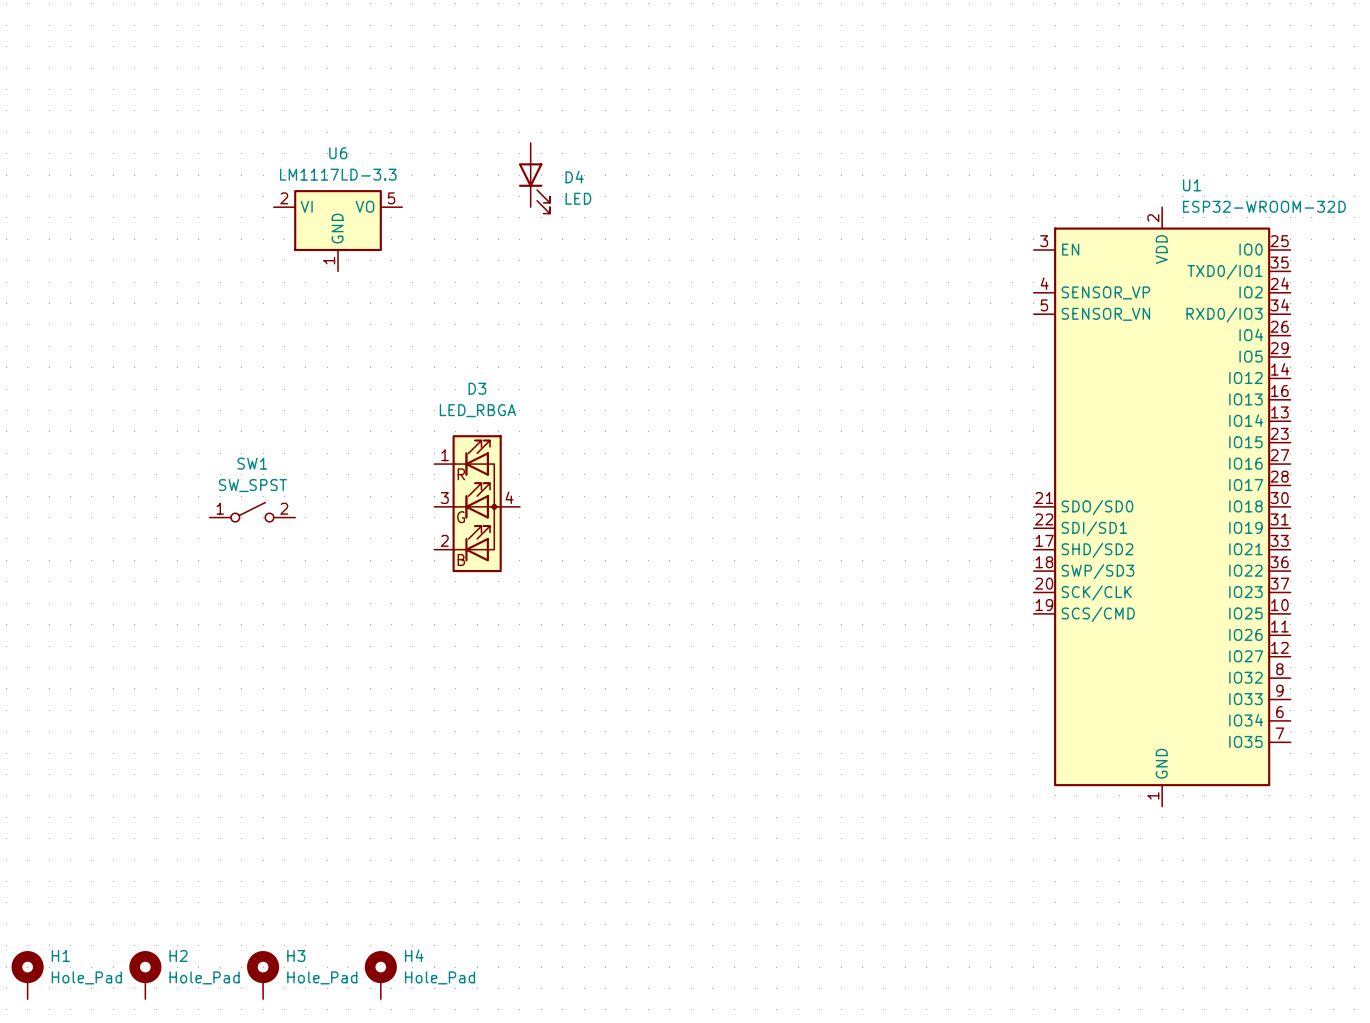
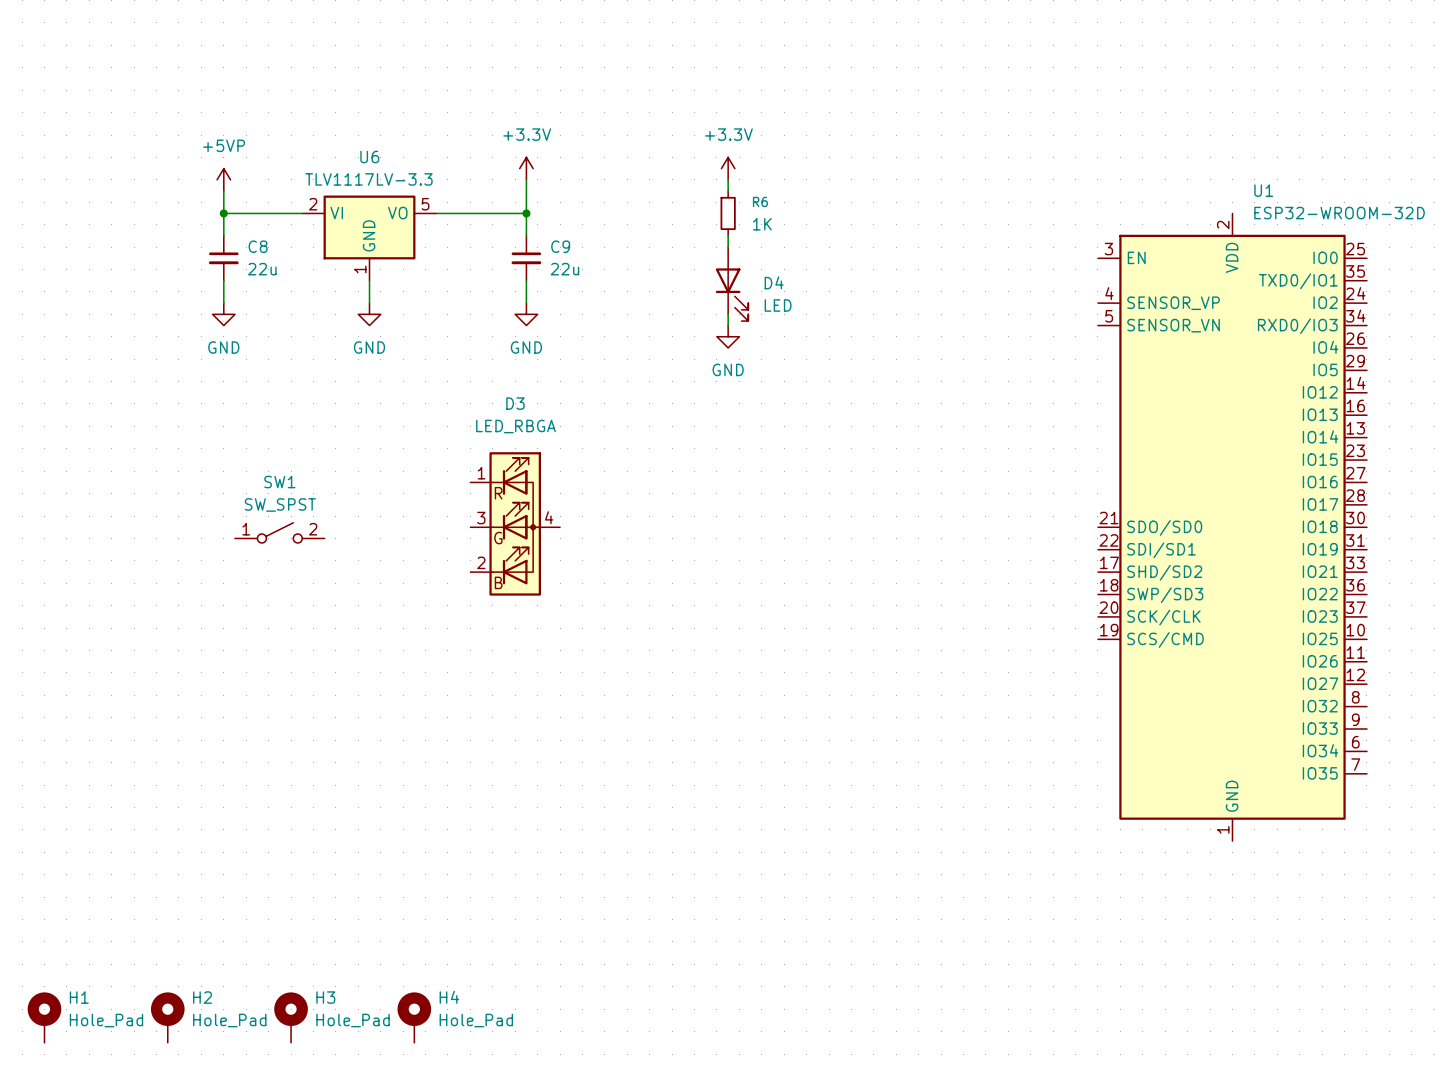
power symbol: none -> +3.3V (526, 168)
power symbol: none -> +3.3V (728, 168)
U6 value: LM1117LD-3.3 (338, 174) -> TLV1117LV-3.3 (368, 179)
power symbol: none -> +5VP (223, 179)
wire: none -> (526, 179) (526, 235)
wire: none -> (728, 179) (728, 191)
D4 position: (534, 178) -> (732, 284)
wire: none -> (223, 191) (223, 235)
wire: none -> (223, 213) (302, 213)
junction: none -> (223, 213)
wire: none -> (436, 213) (526, 213)
junction: none -> (526, 213)
R6: none -> 1K (728, 213)
wire: none -> (728, 235) (728, 247)
C8: none -> 22u (223, 258)
C9: none -> 22u (526, 258)
wire: none -> (223, 280) (223, 303)
wire: none -> (369, 280) (369, 303)
wire: none -> (526, 280) (526, 303)
power symbol: none -> GND (223, 314)
power symbol: none -> GND (369, 314)
power symbol: none -> GND (526, 314)
wire: none -> (728, 314) (728, 325)
power symbol: none -> GND (728, 336)

